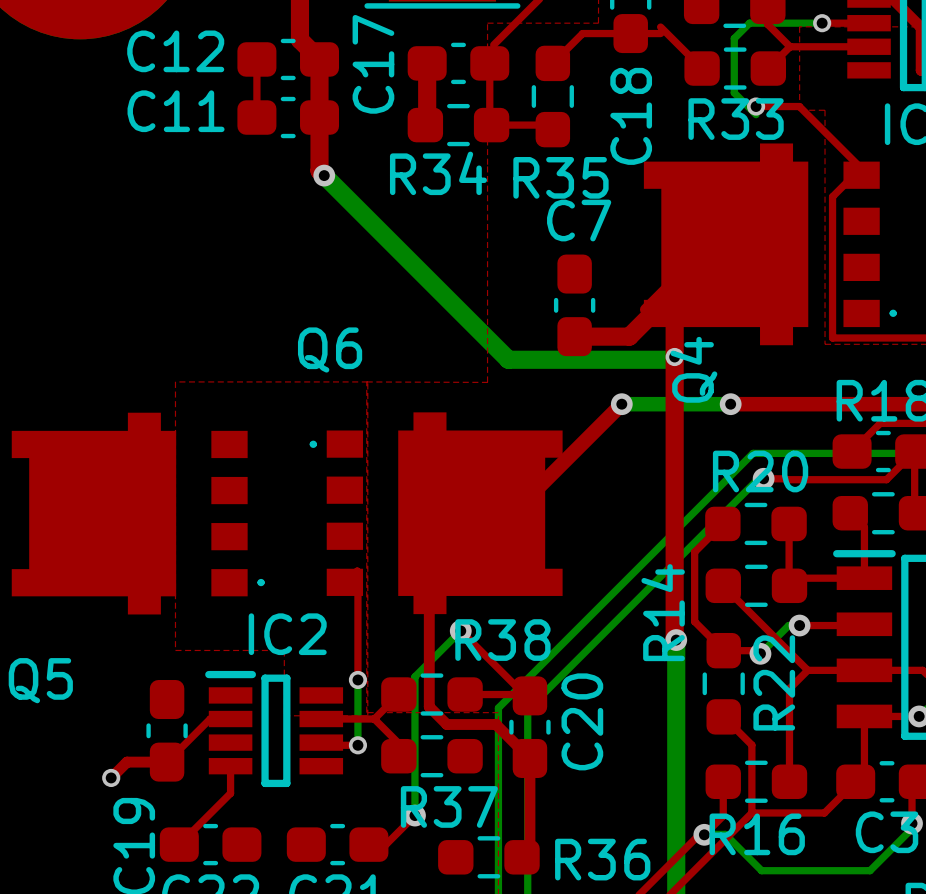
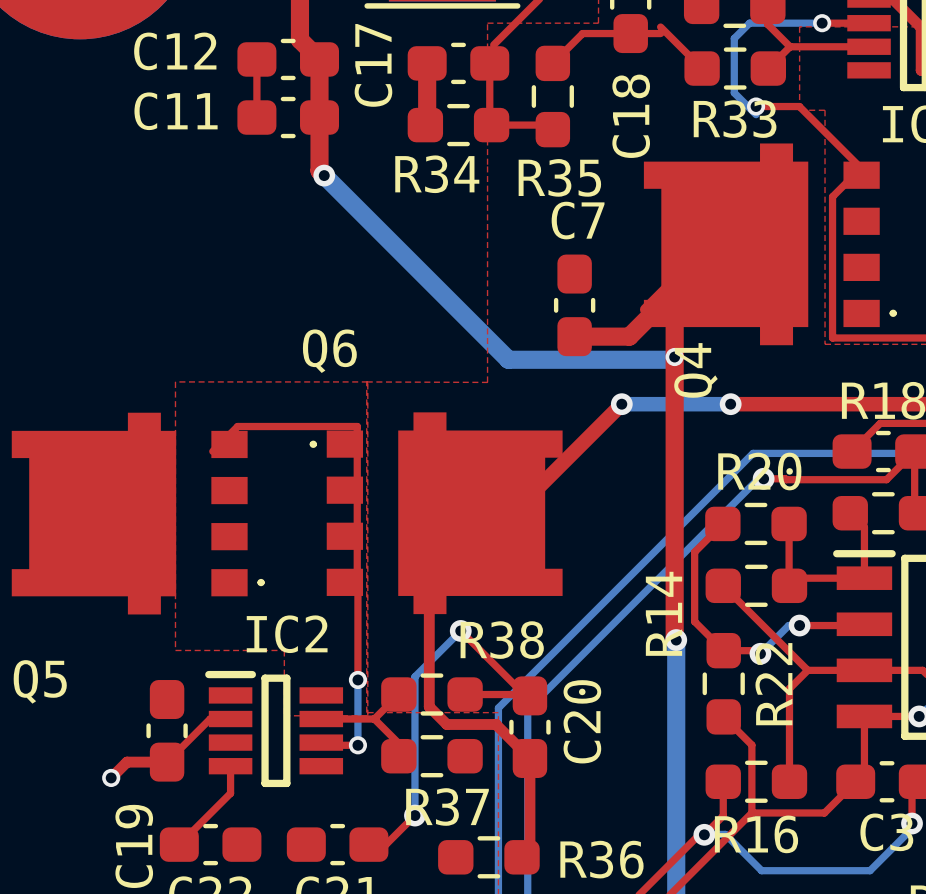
top track: none -> (212, 451) (237, 426) (357, 426) (357, 571)

